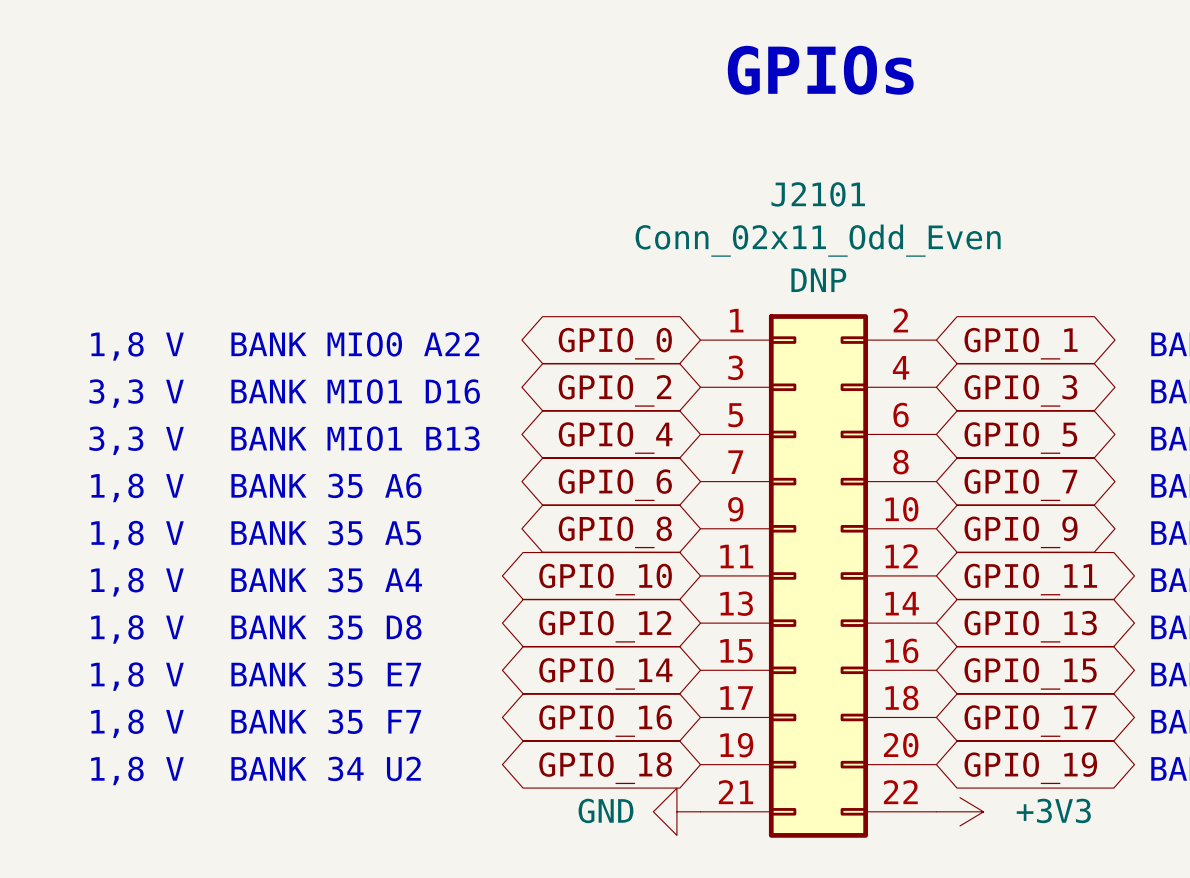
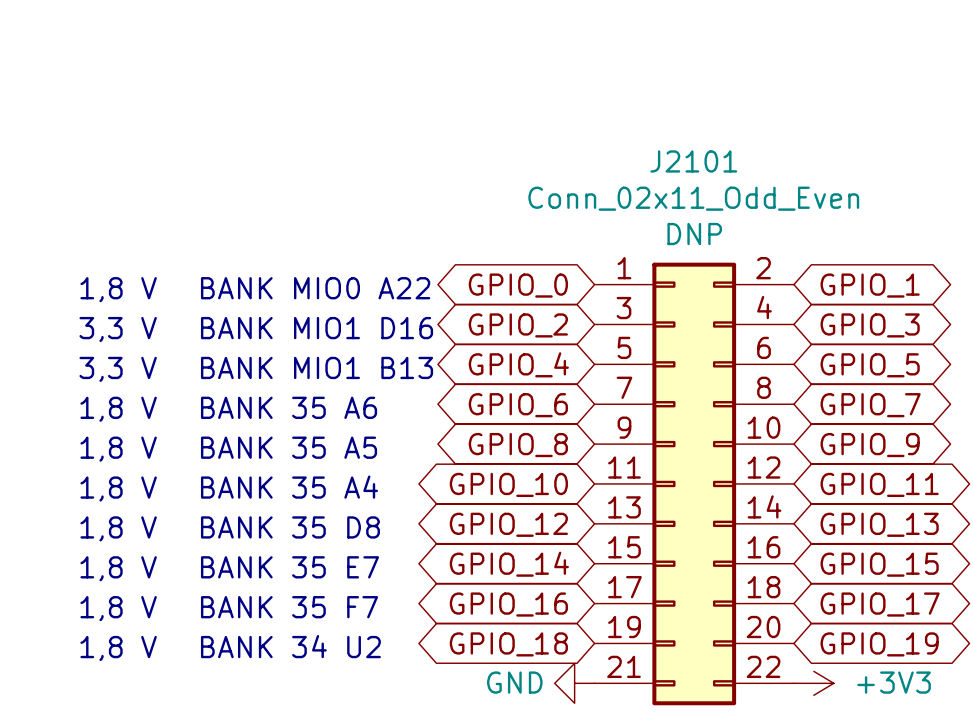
text: GPIOs (820, 70) -> none

